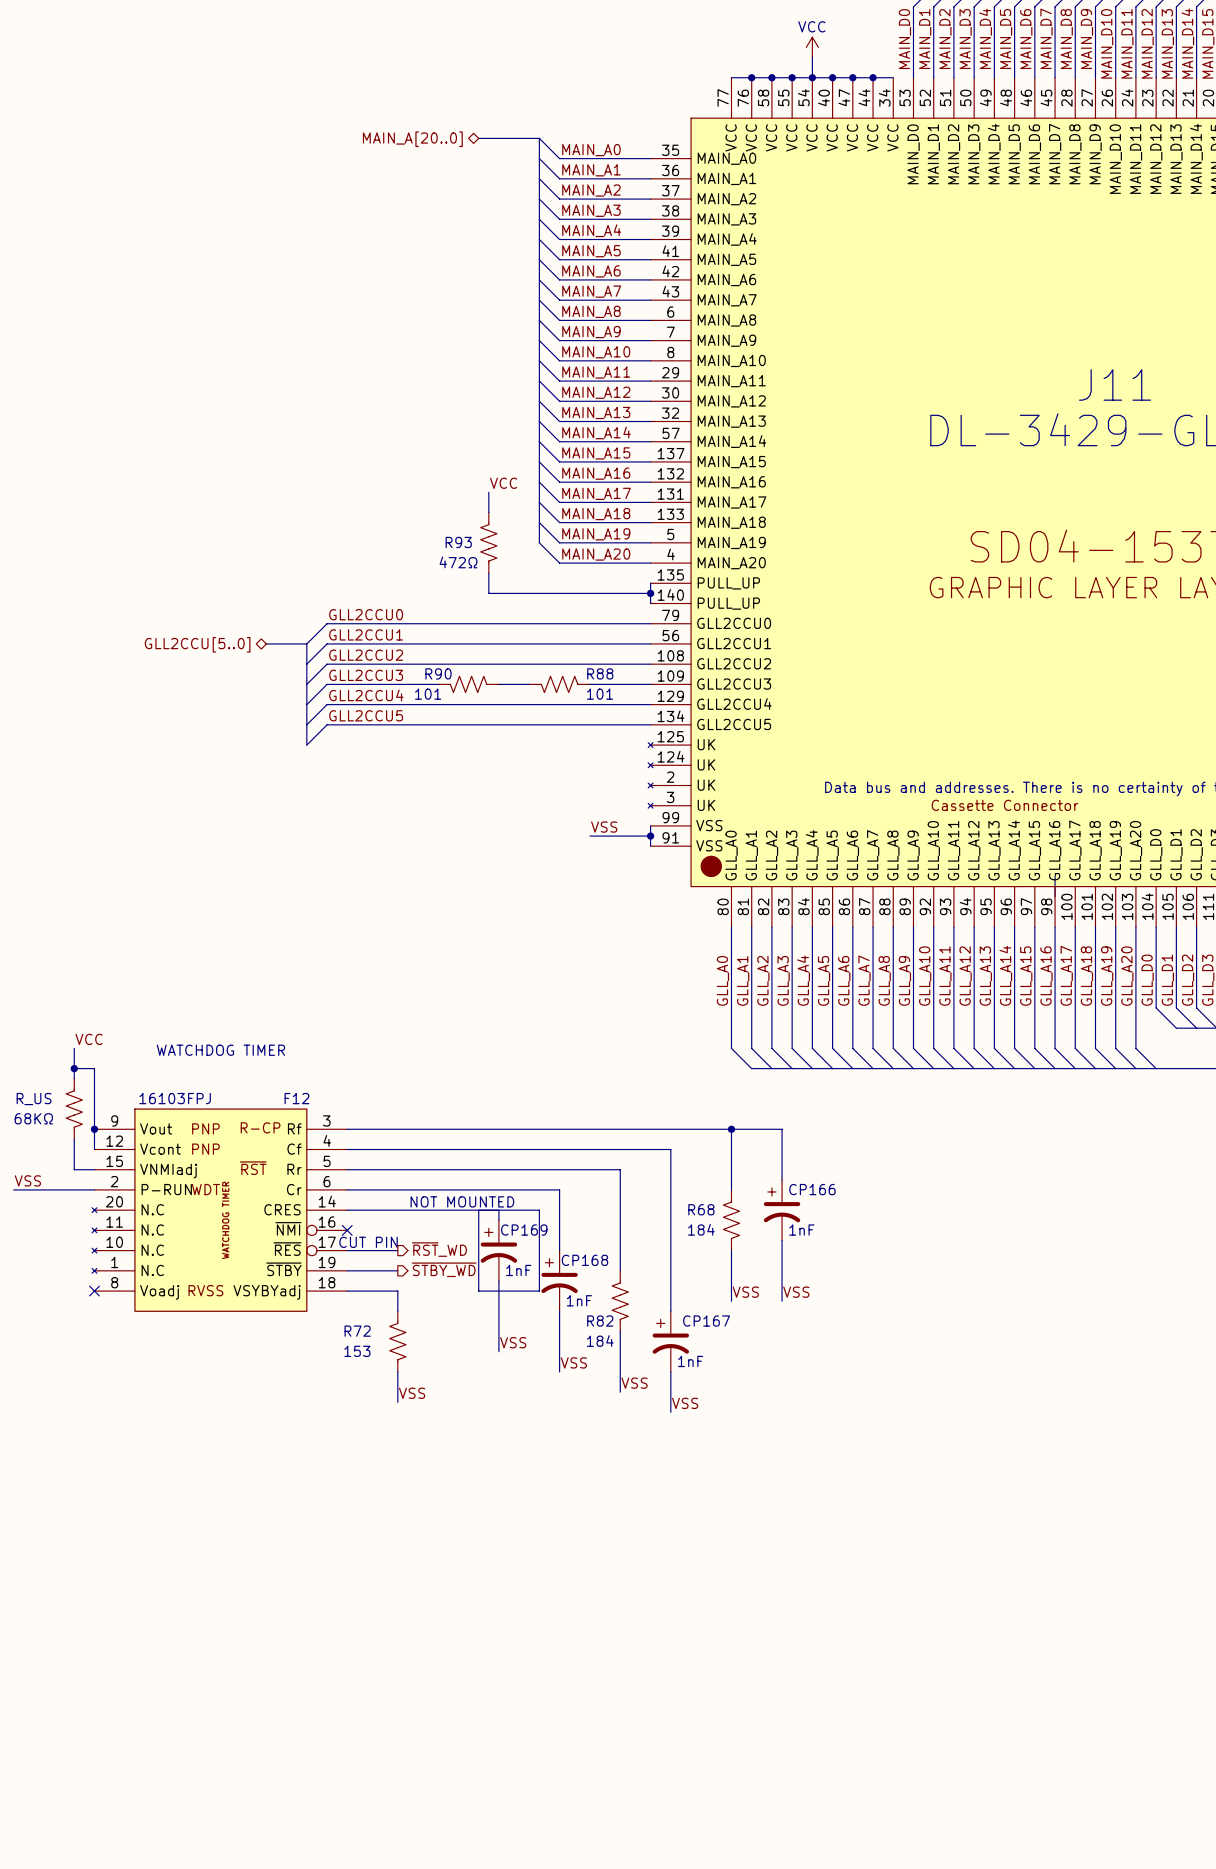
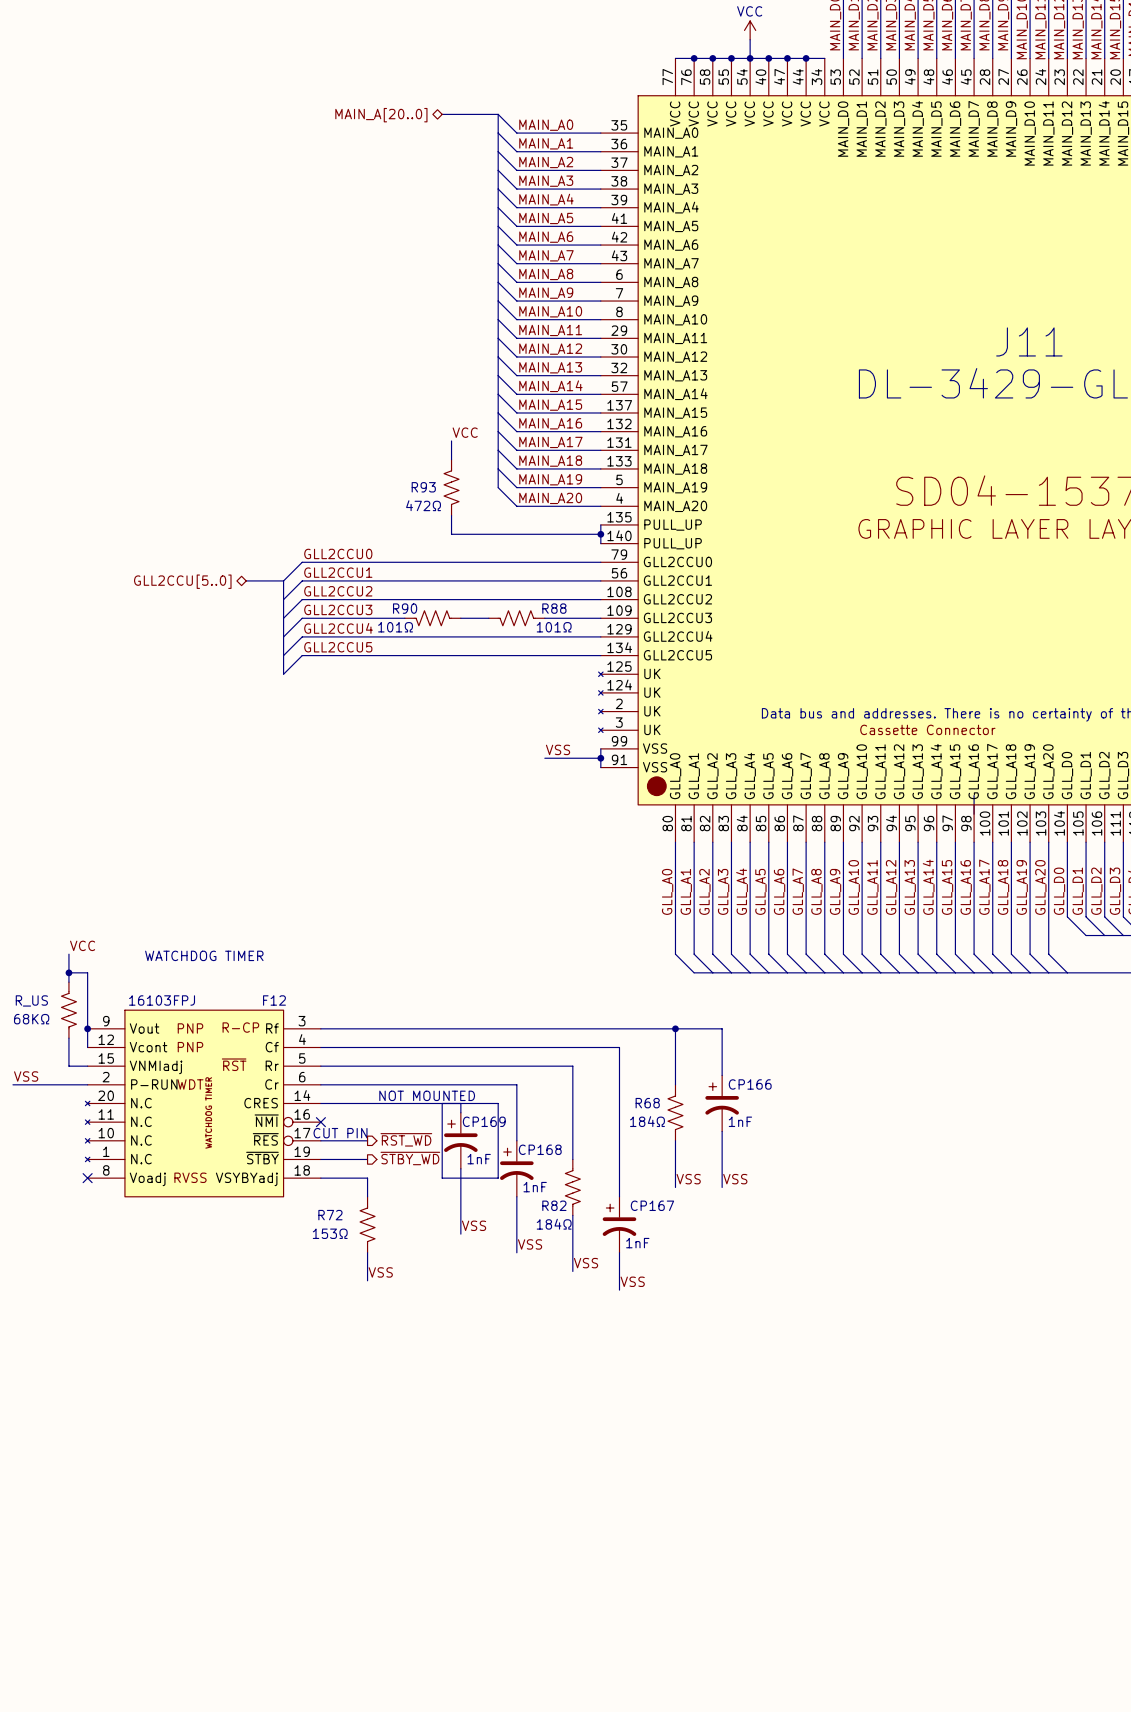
R90 value: 101 (428, 694) -> 101Ω (395, 627)
R88 value: 101 (600, 694) -> 101Ω (554, 627)
R68 value: 184 (701, 1229) -> 184Ω (647, 1121)
hierarchical label: ~{RST}_WD (439, 1249) -> ~{RST_WD} (406, 1139)
R82 value: 184 (600, 1340) -> 184Ω (554, 1224)
R72 value: 153 (357, 1351) -> 153Ω (330, 1233)

